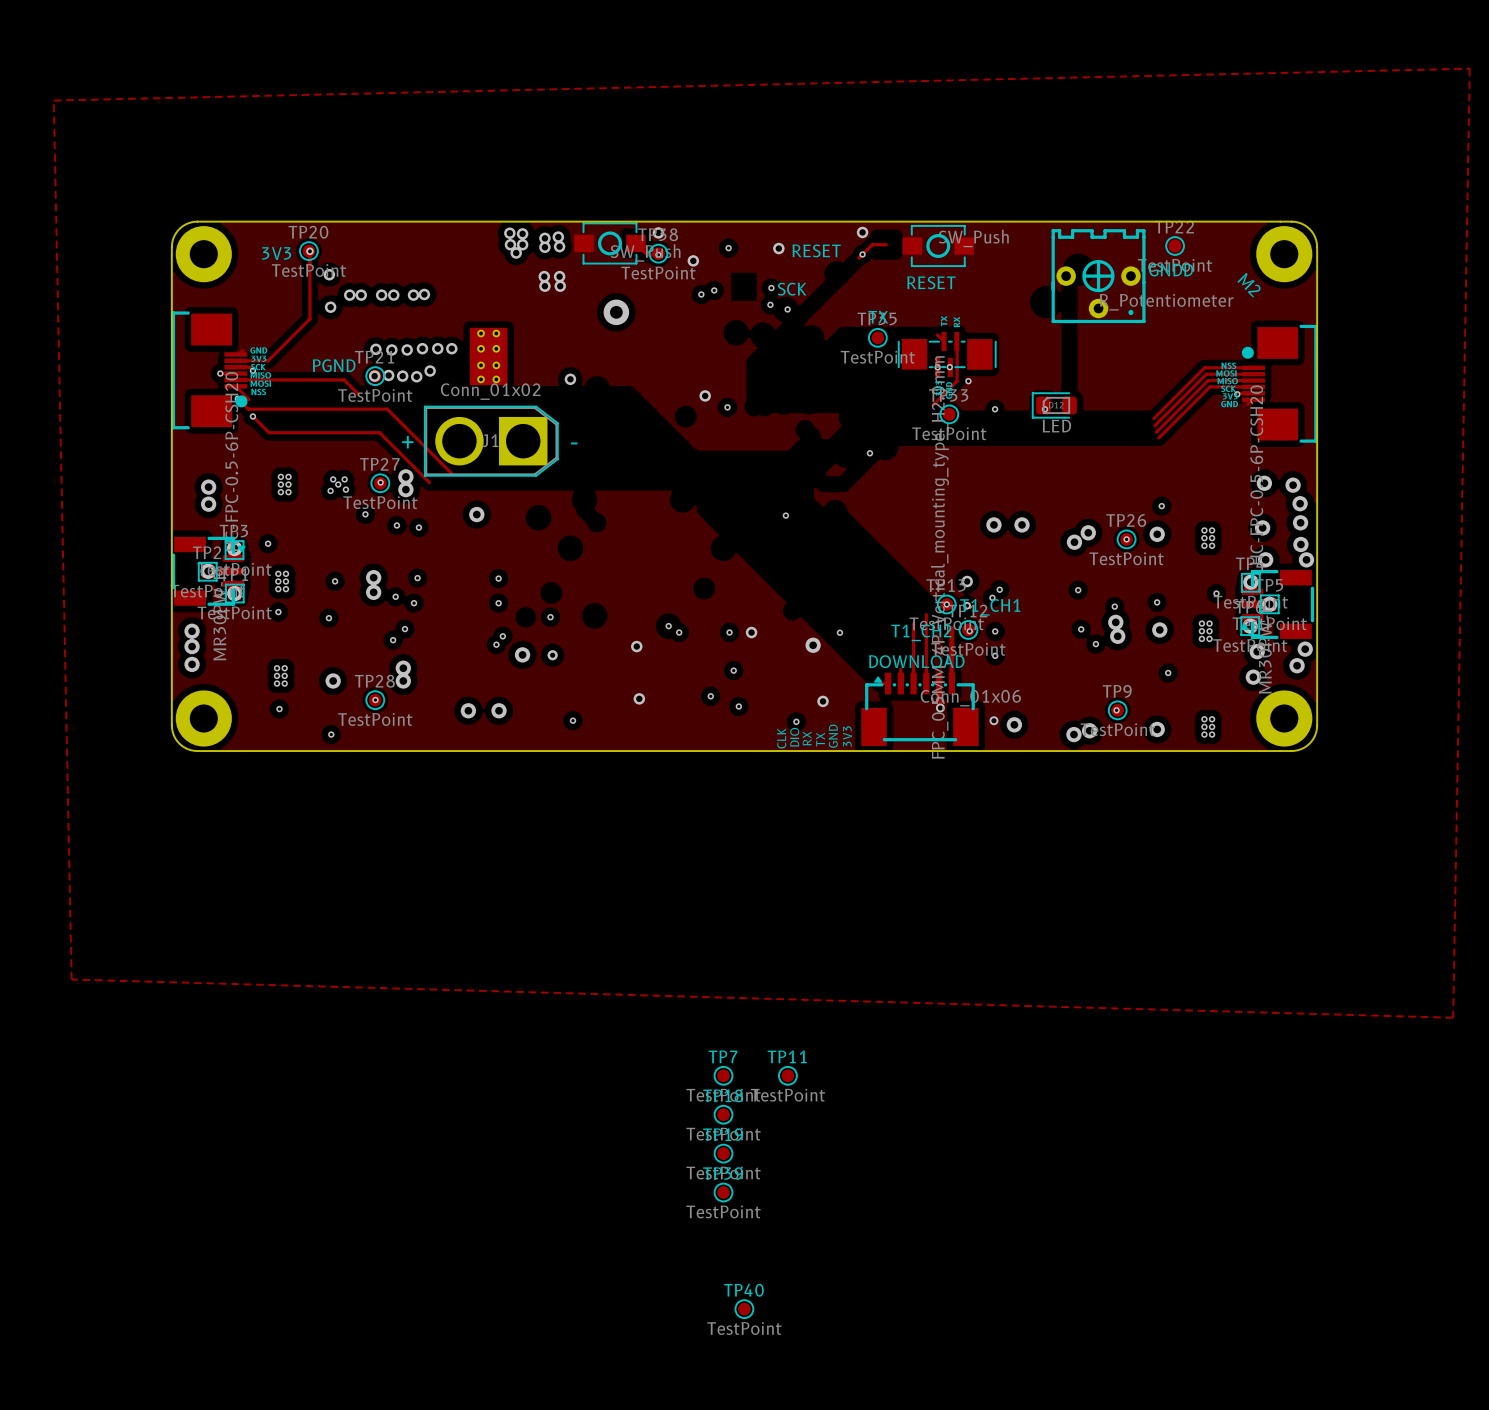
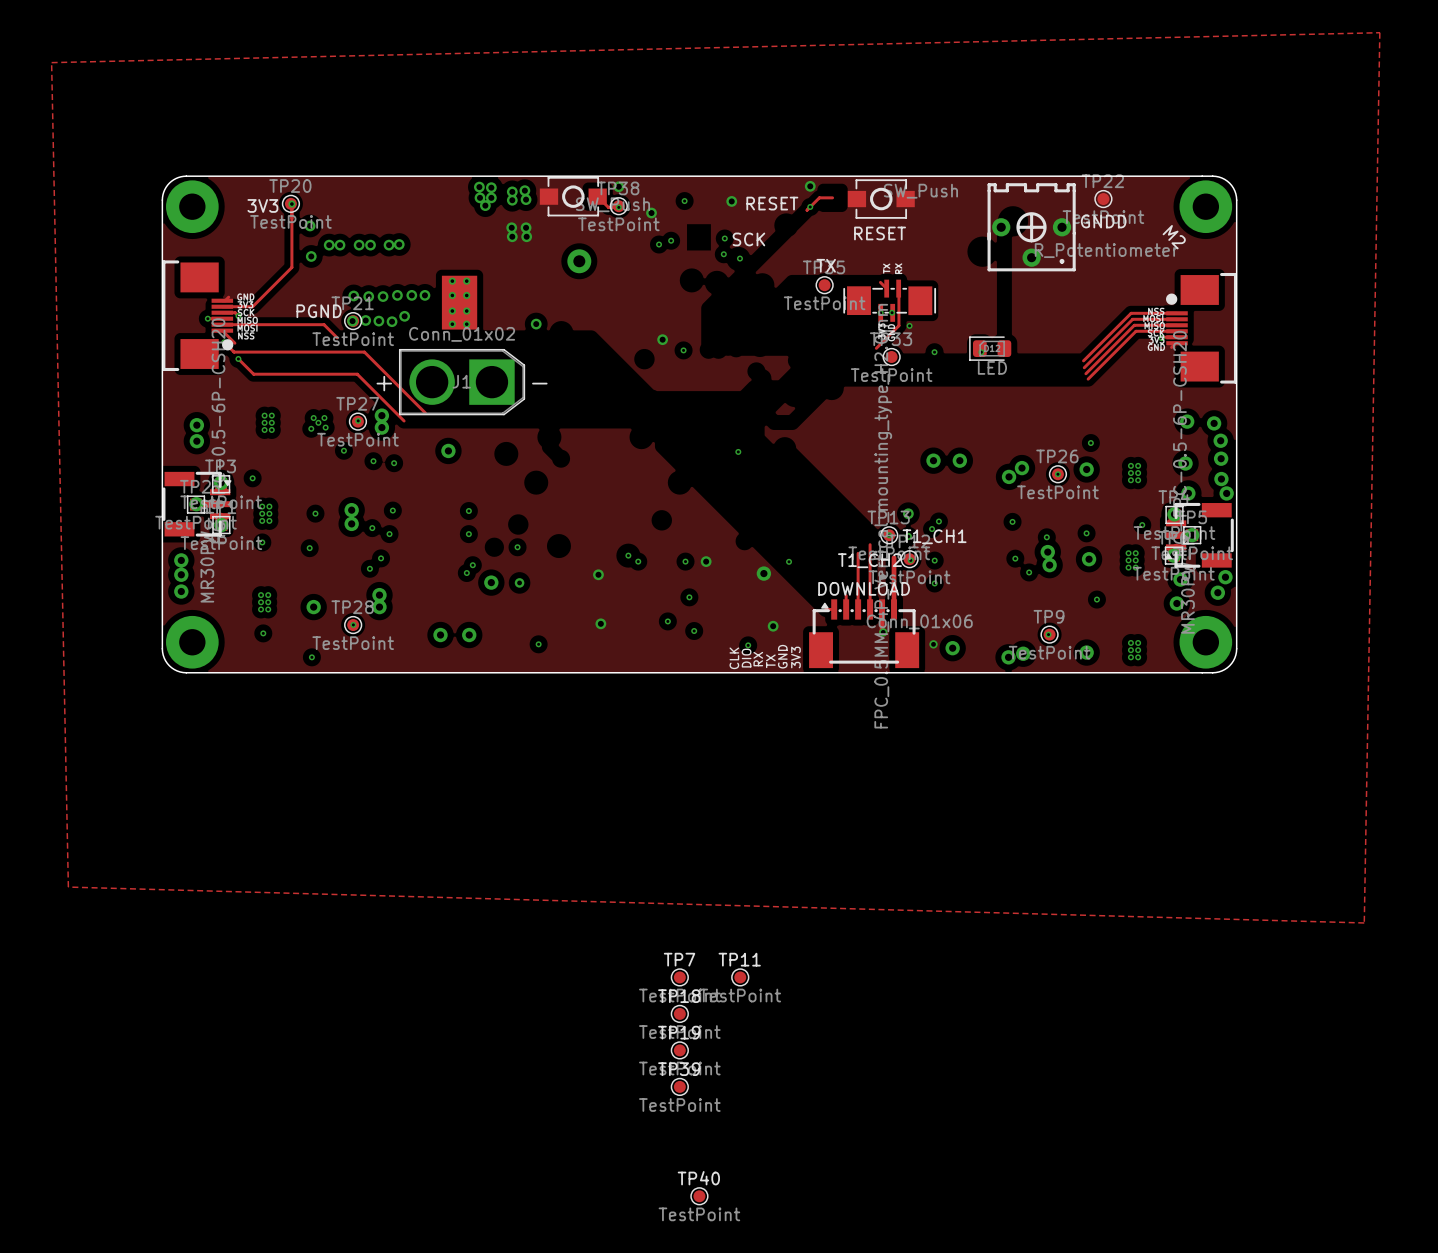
via: (869, 453) -> none

